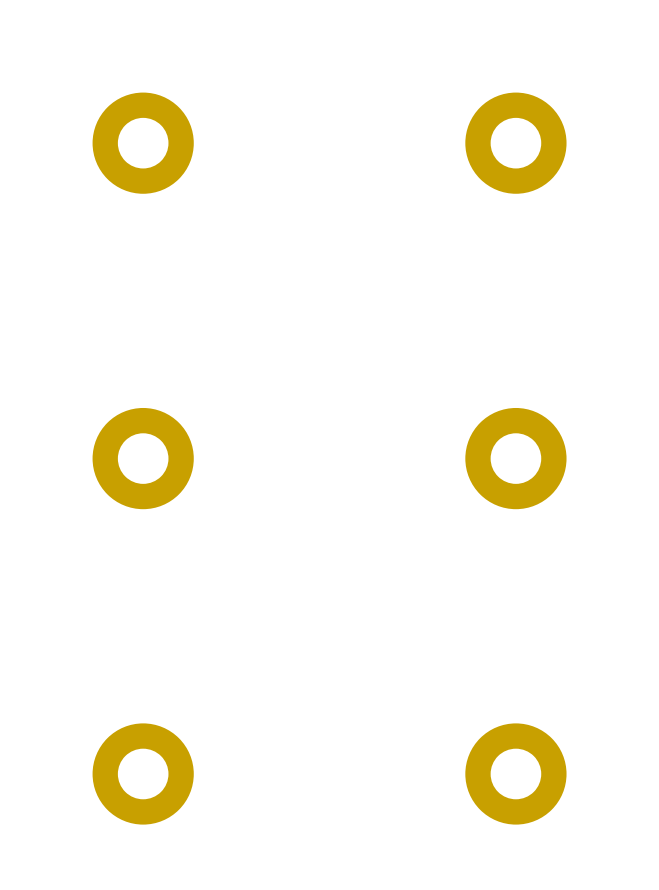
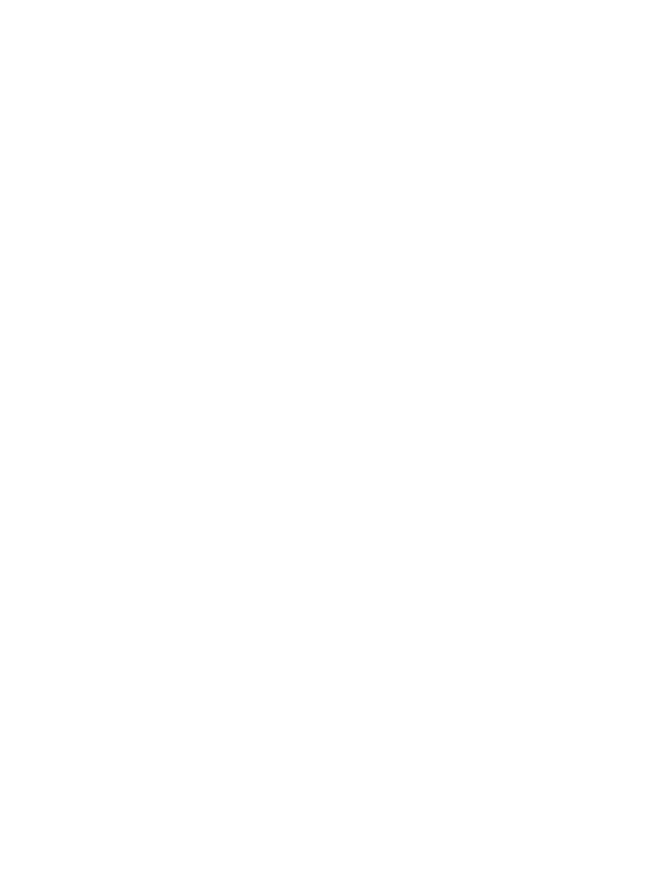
part: (143, 143) -> none
part: (515, 143) -> none
part: (143, 458) -> none
part: (515, 458) -> none
part: (143, 773) -> none
part: (515, 773) -> none

